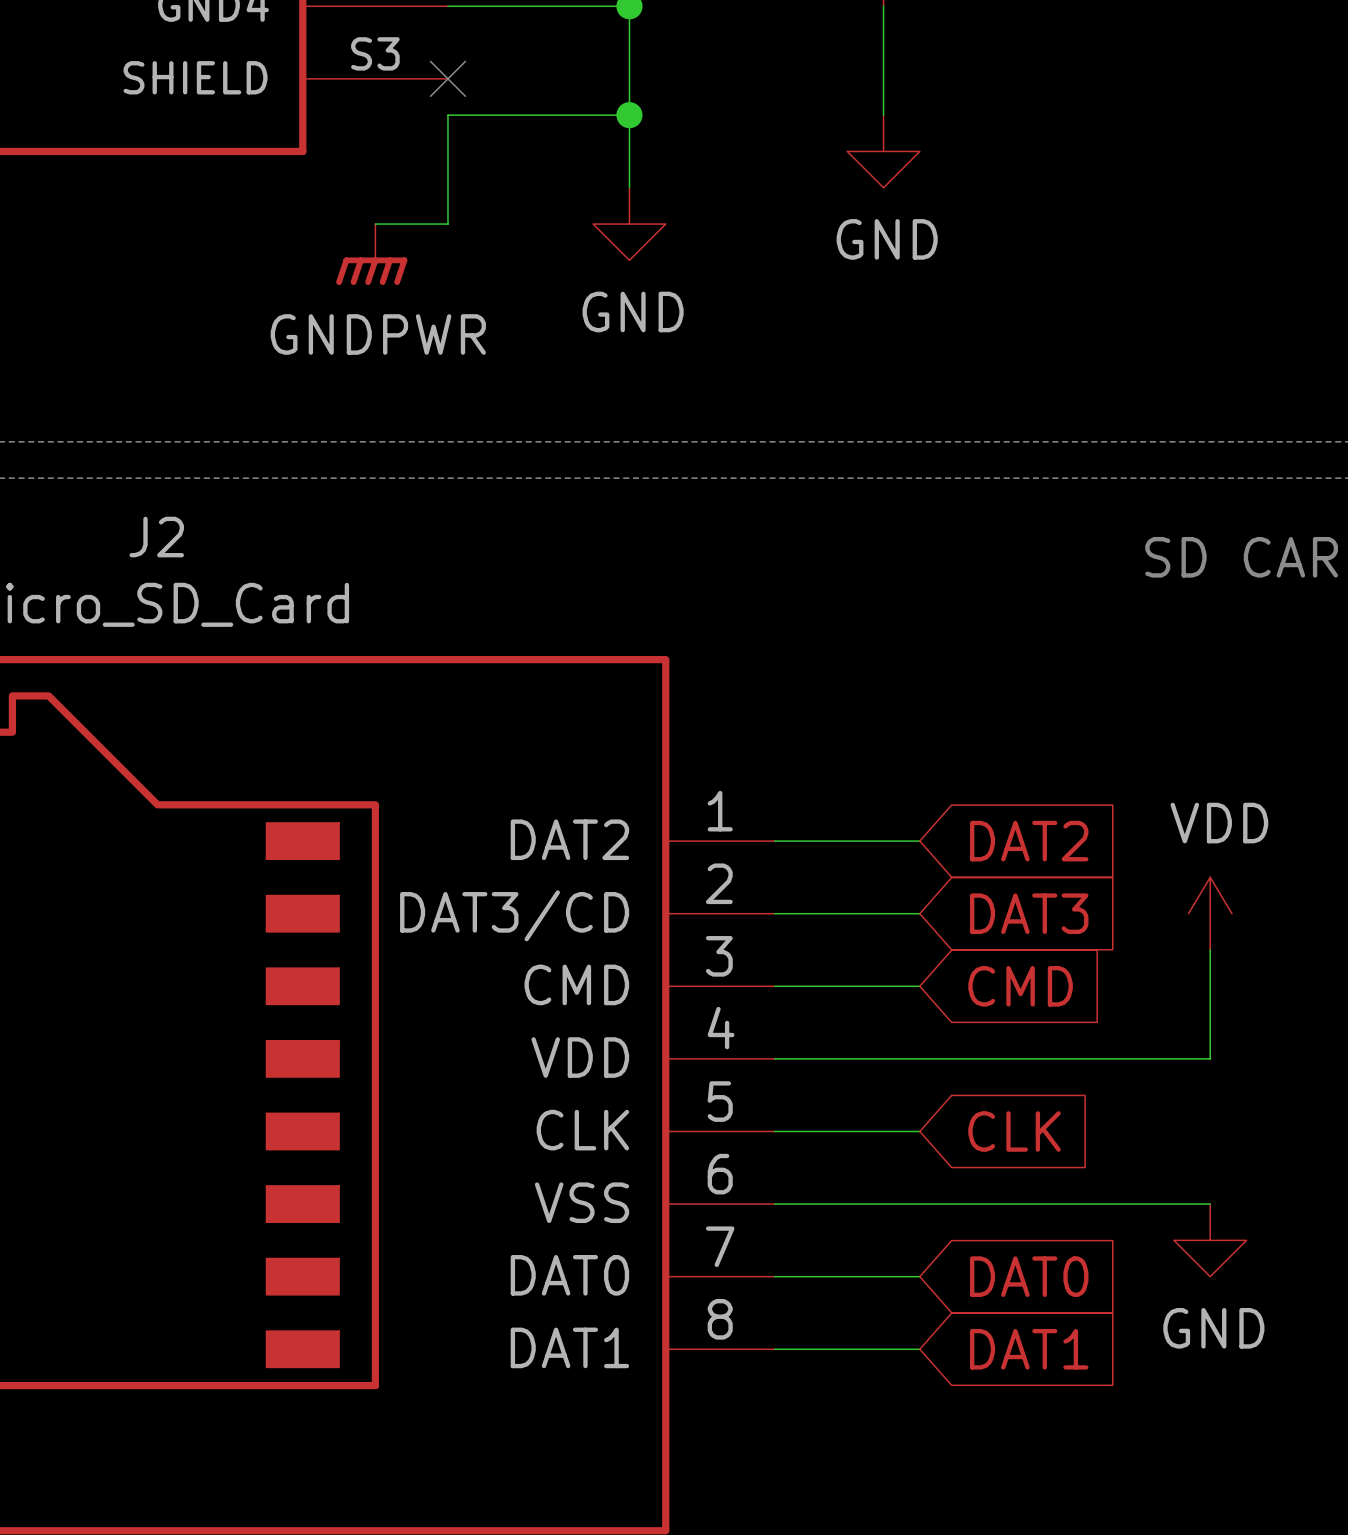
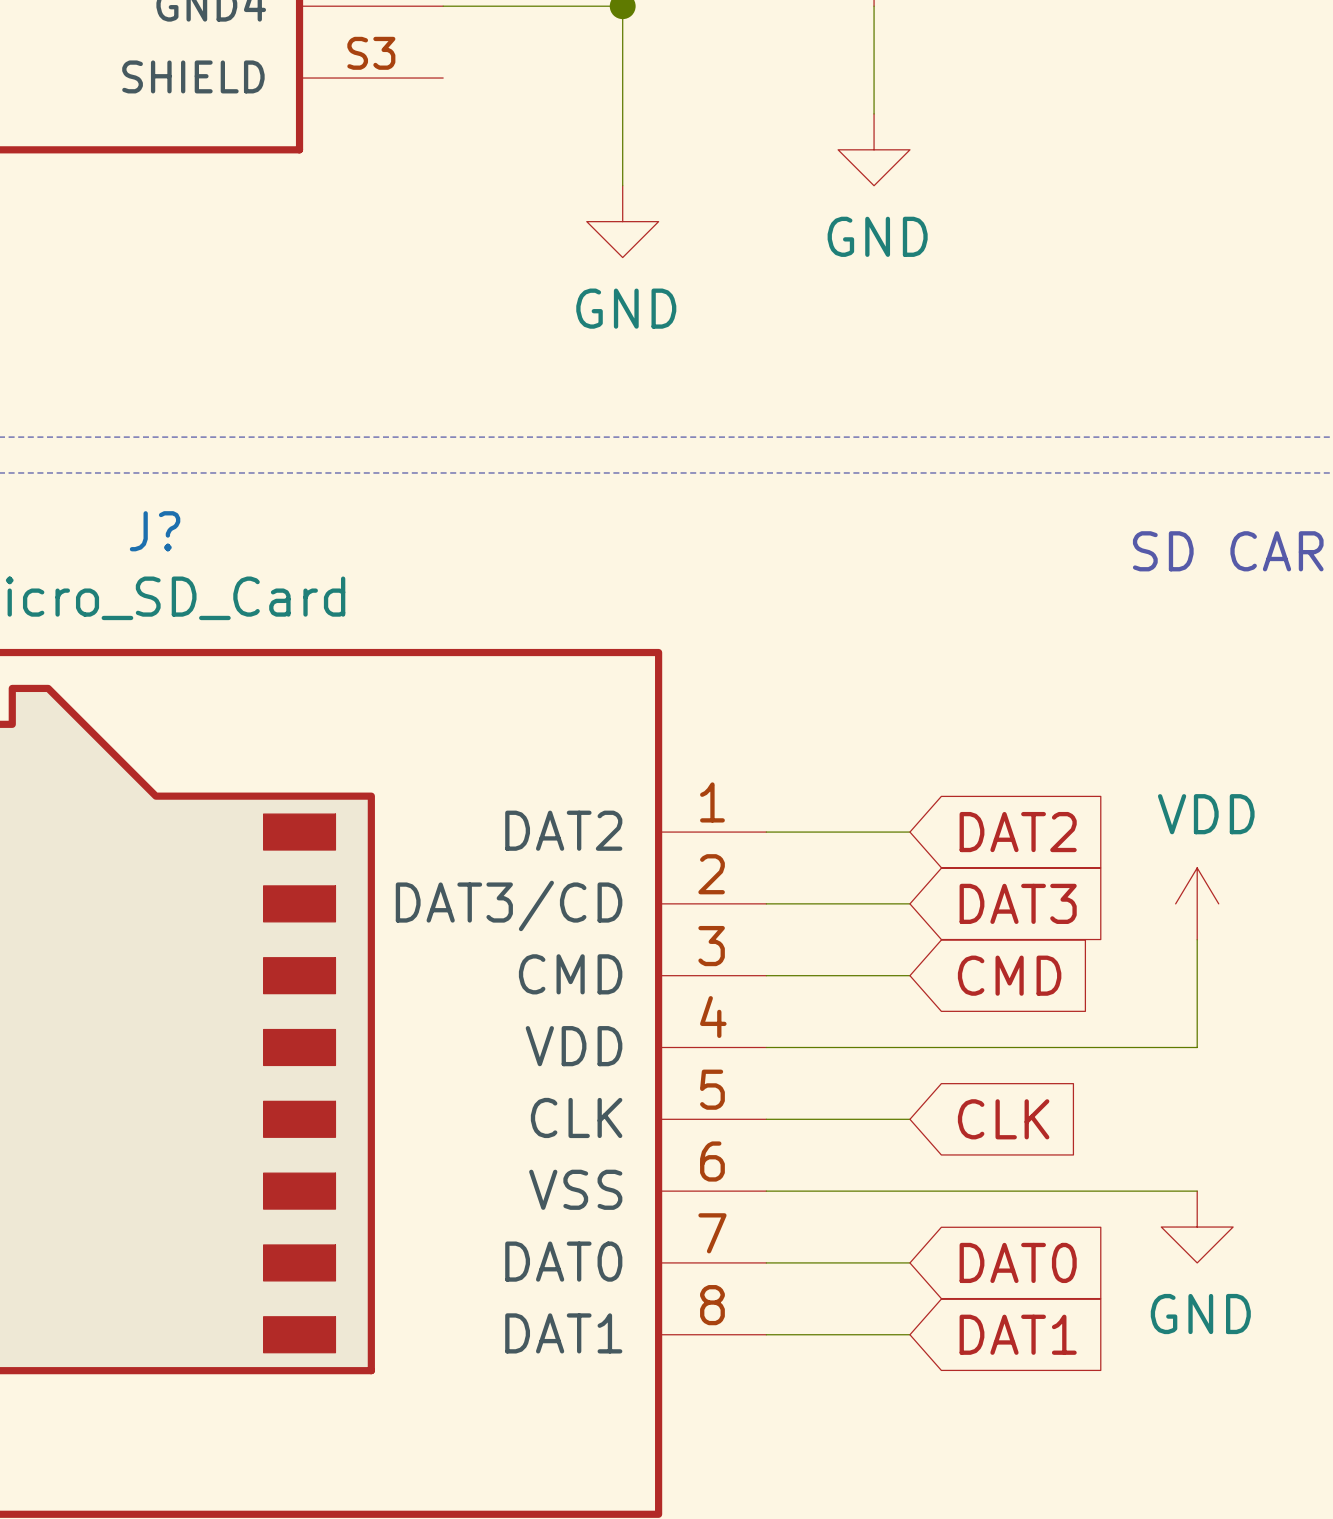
no-connect mark: (447, 78) -> none
wire: (629, 115) (447, 115) (447, 224) (375, 224) -> none
junction: (629, 115) -> none
power symbol: GNDPWR (371, 254) -> none
J2 name: J2 (156, 537) -> J? (155, 531)

